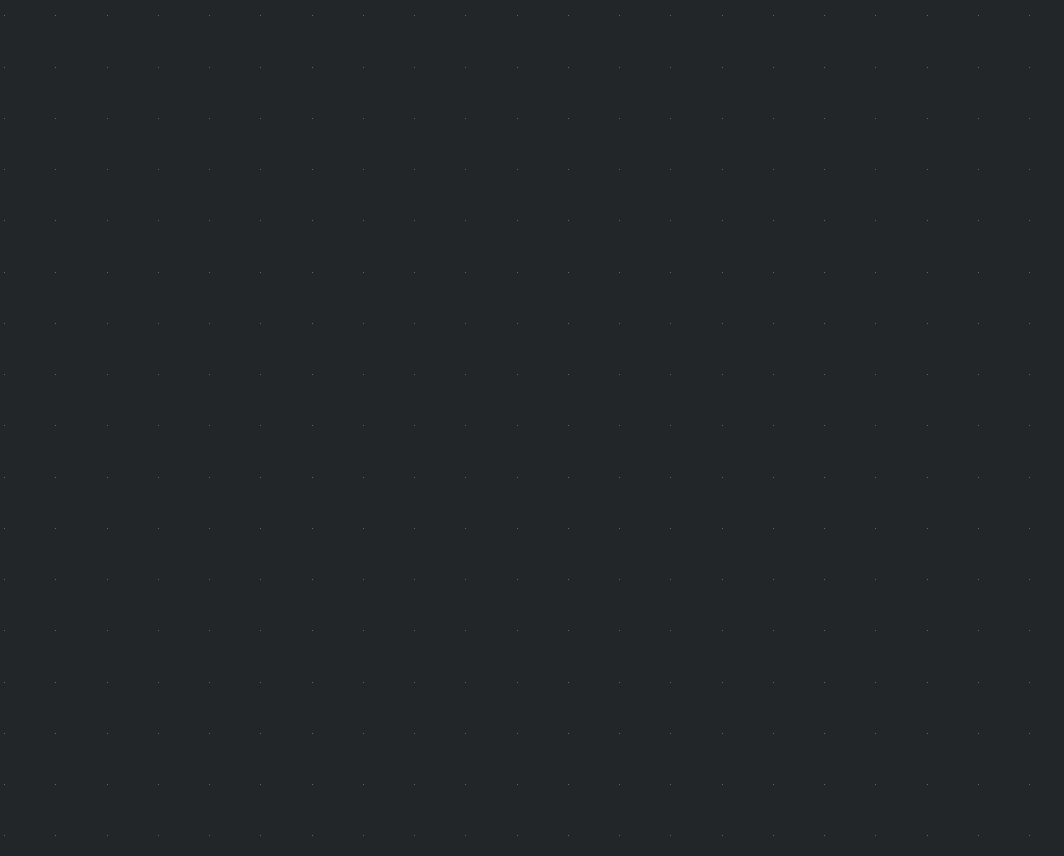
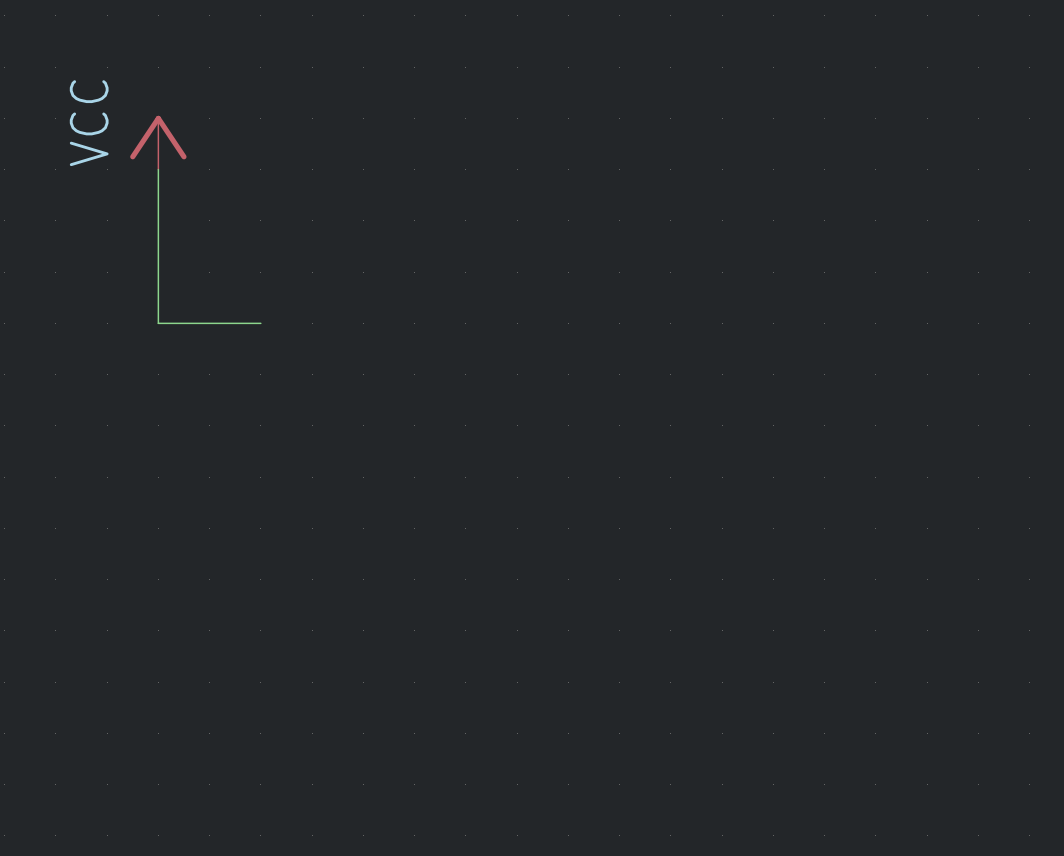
power symbol: none -> VCC (158, 142)
wire: none -> (158, 169) (158, 323) (260, 323)

